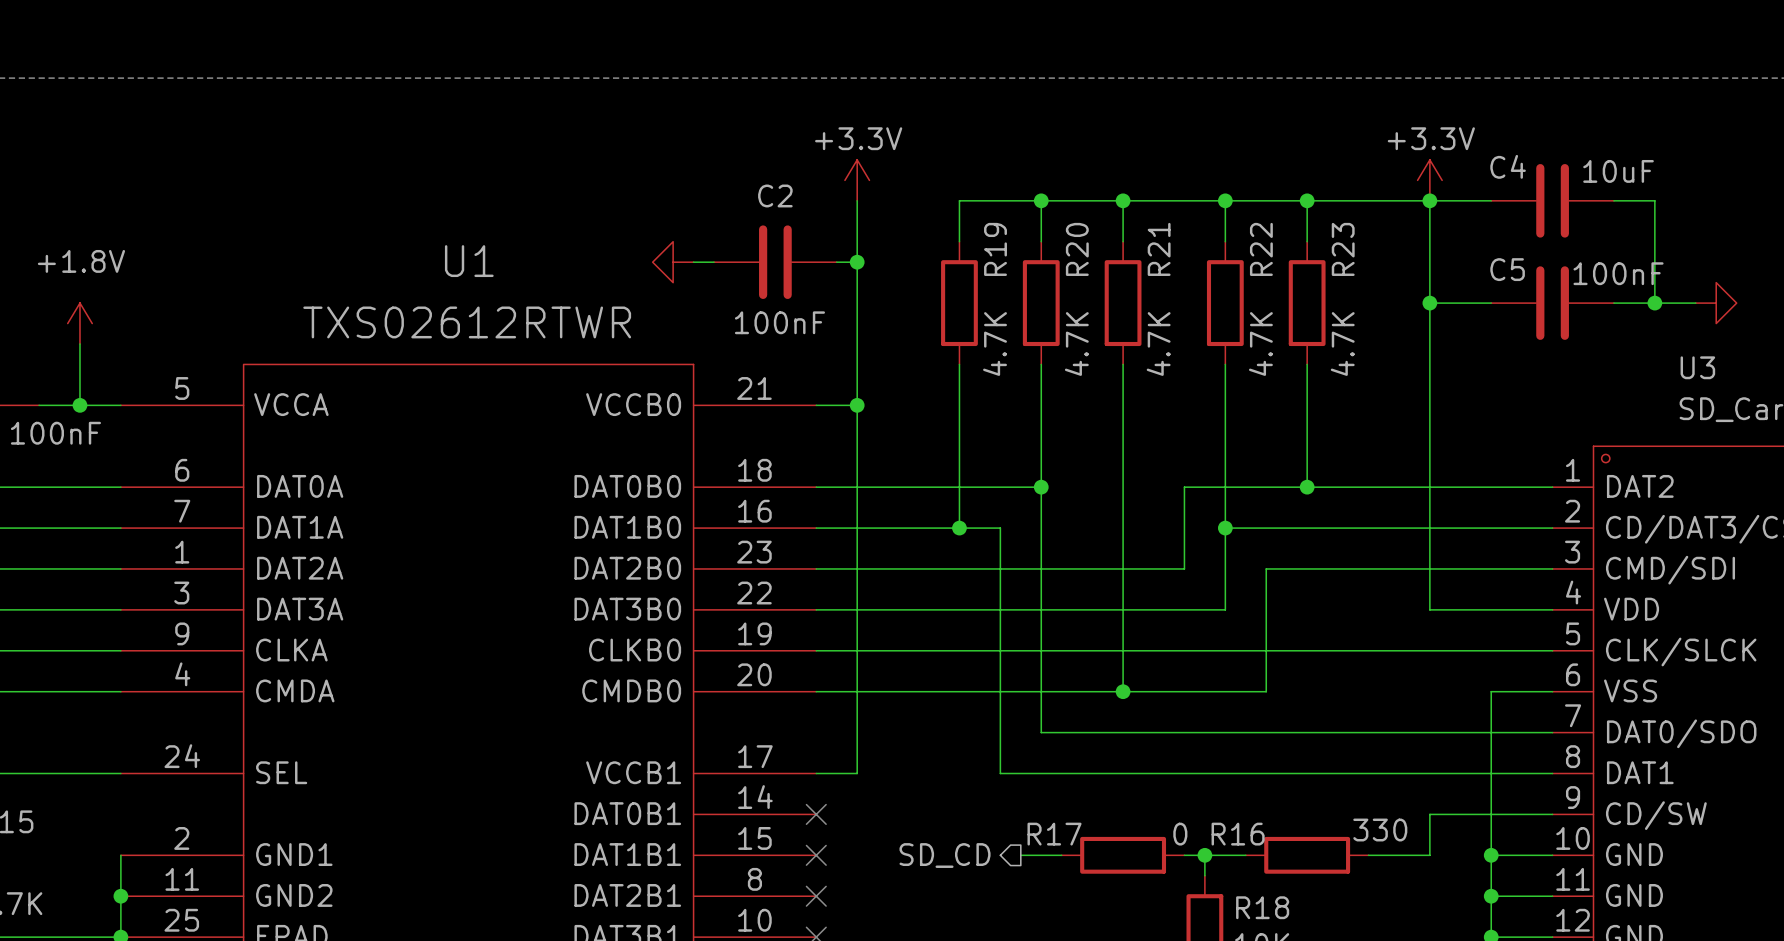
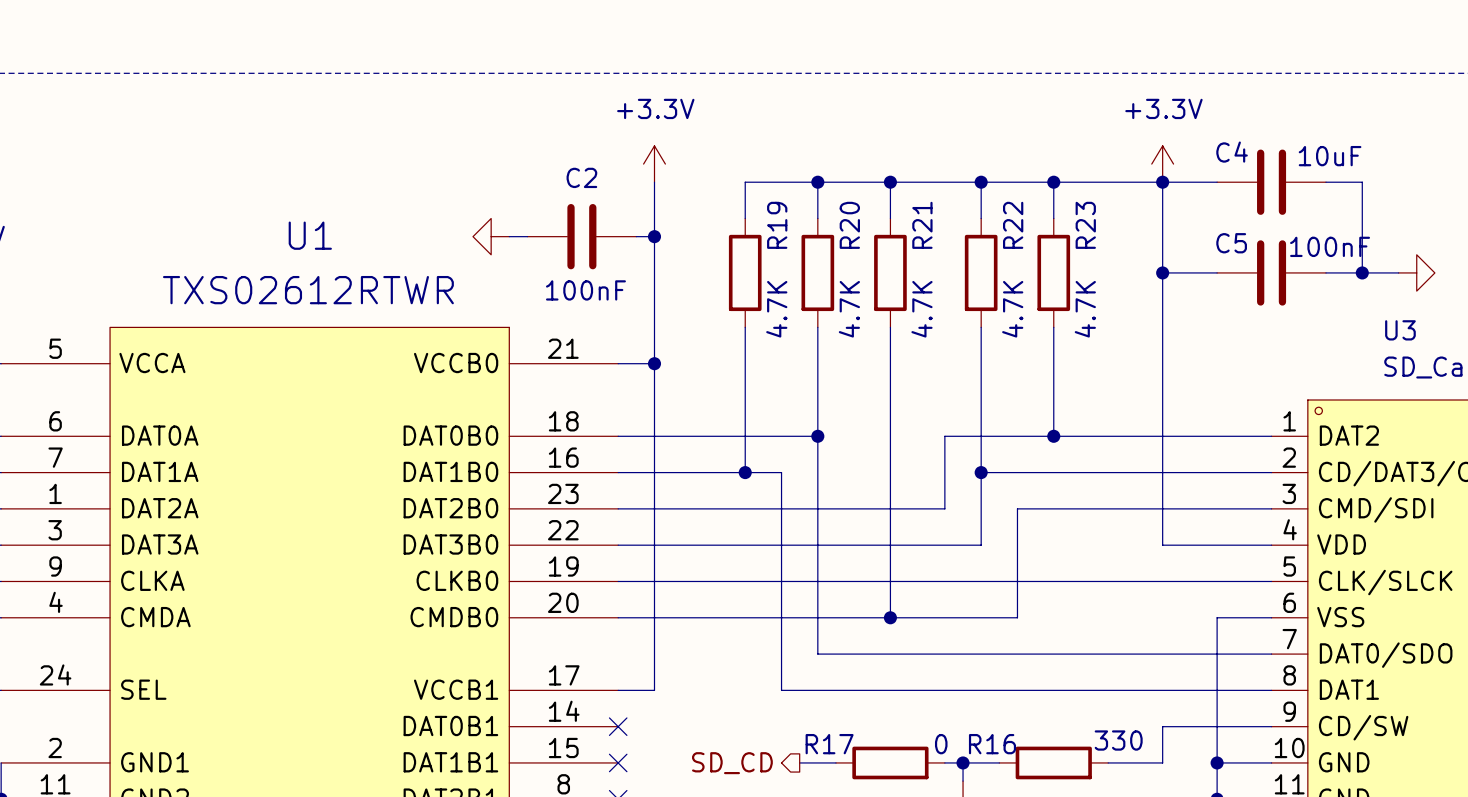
power symbol text position: +3.3V (858, 138) -> +3.3V (655, 108)
power symbol text position: +3.3V (1431, 138) -> +3.3V (1163, 108)

